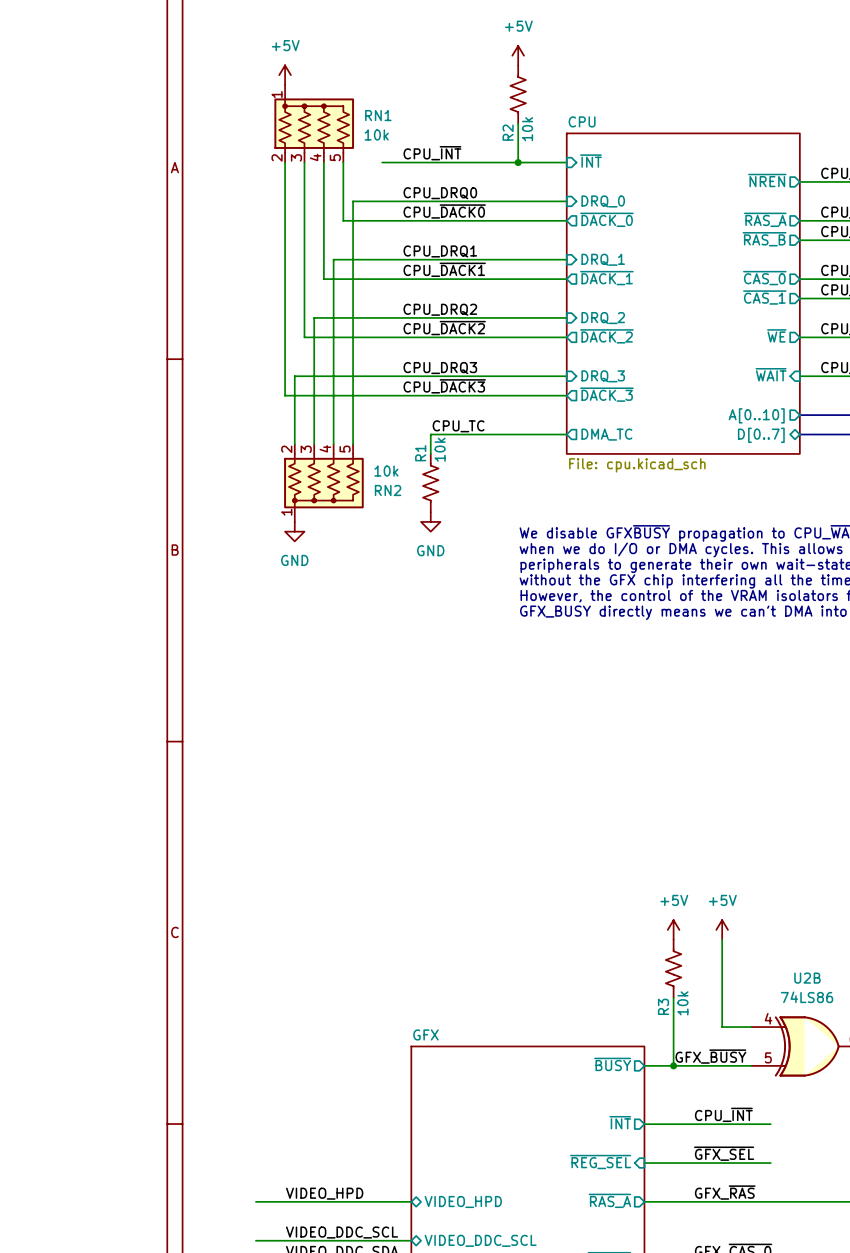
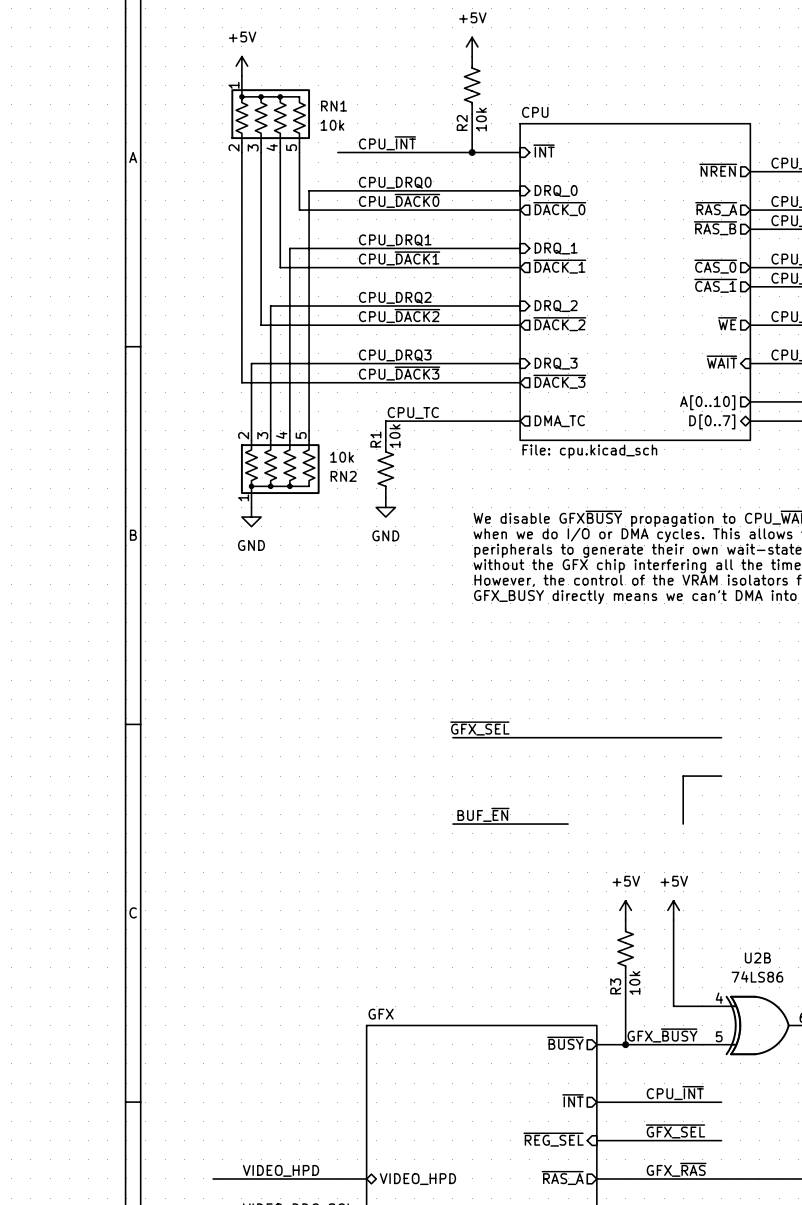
label: none -> ~{GFX_SEL} (479, 728)
wire: none -> (452, 737) (721, 737)
wire: none -> (721, 776) (683, 776) (683, 824)
label: none -> BUF_~{EN} (483, 814)
wire: none -> (452, 824) (568, 824)

